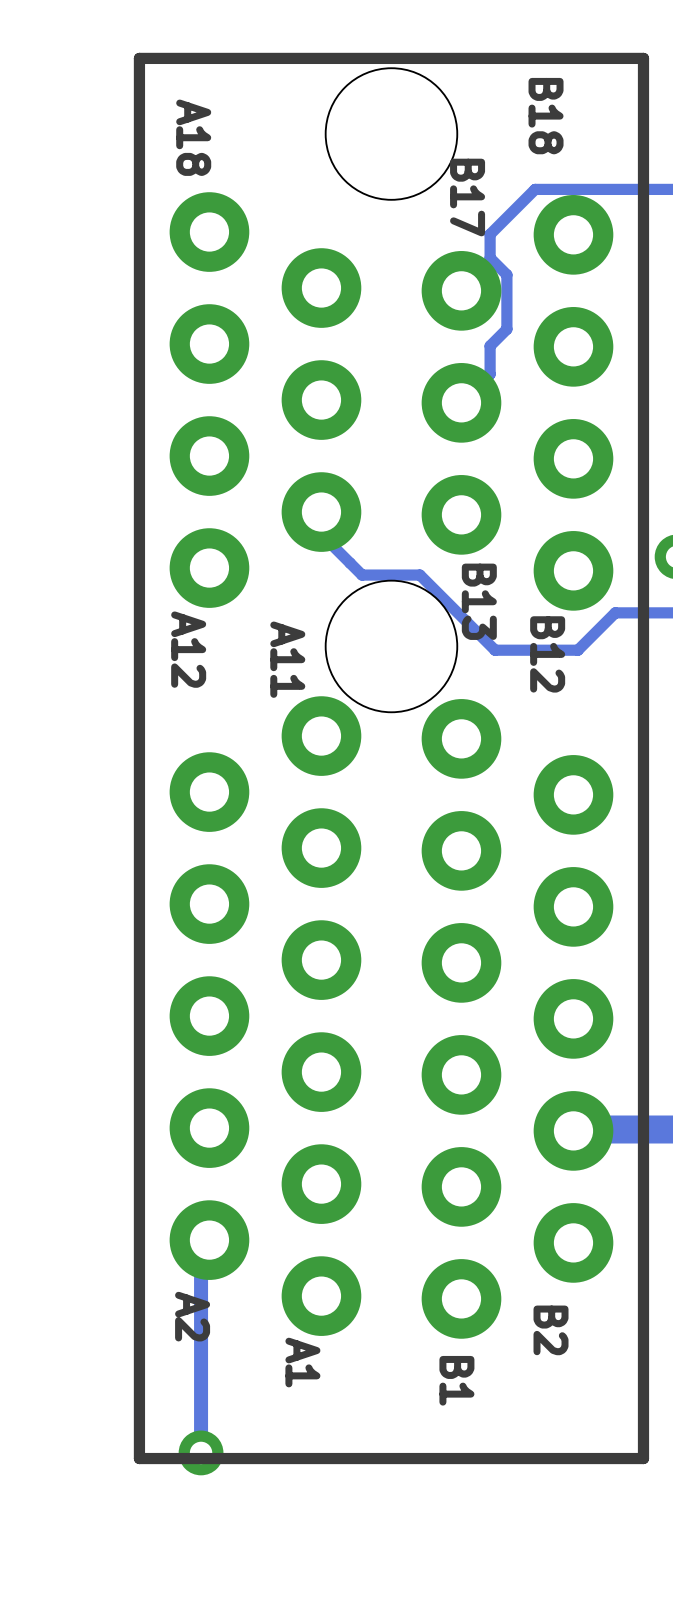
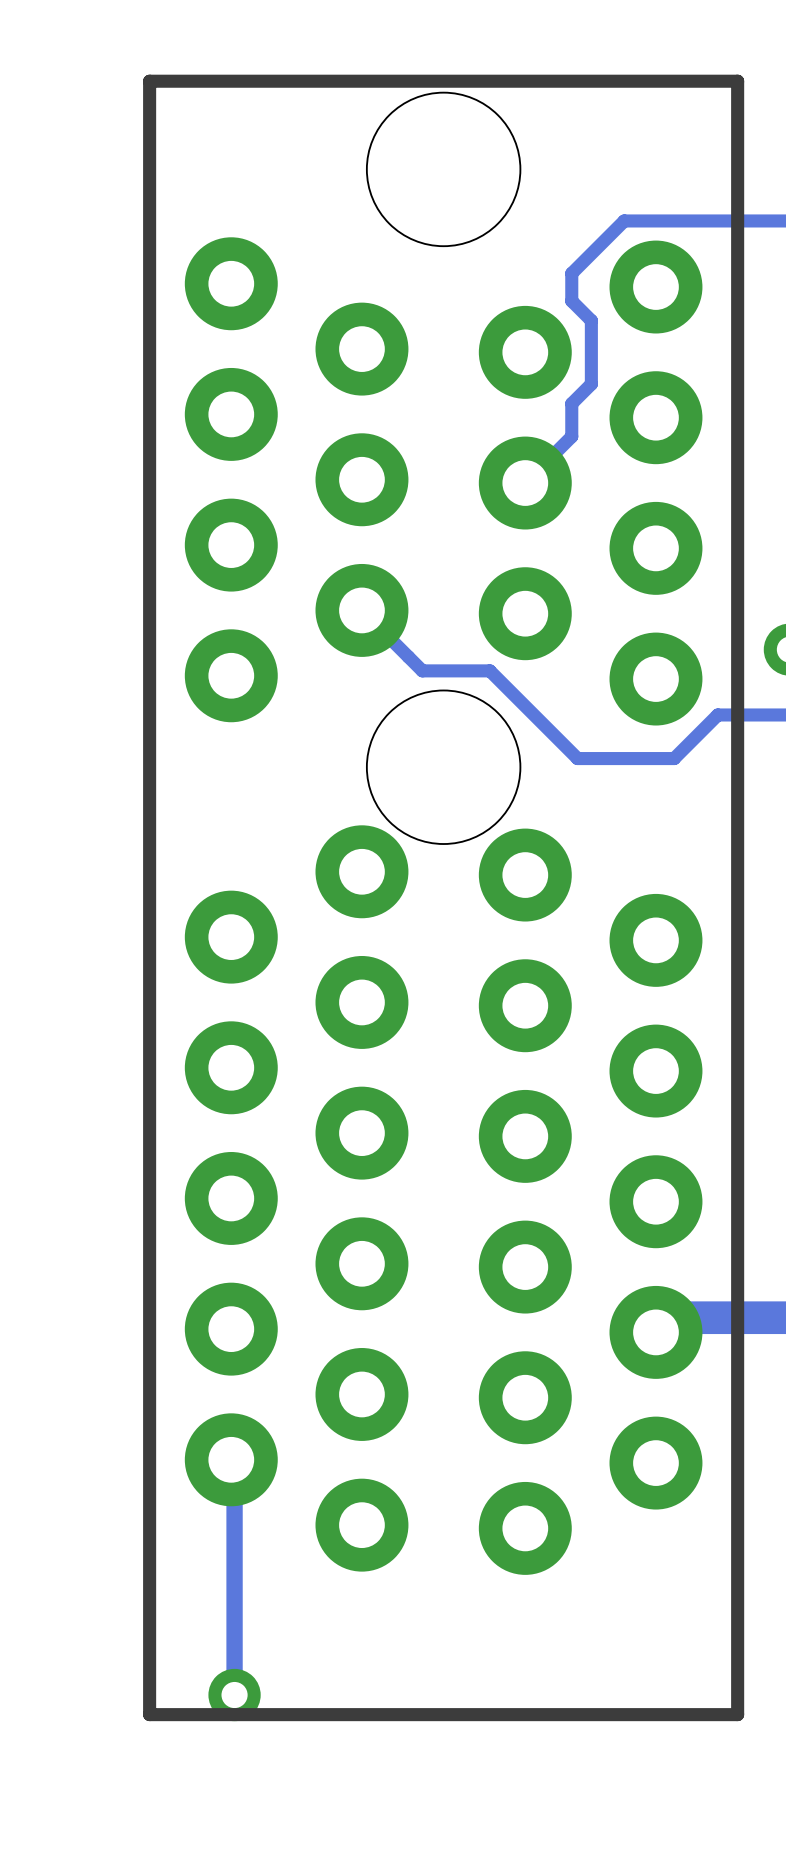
part footprint: [133, 52, 650, 1465] -> [143, 74, 745, 1722]

